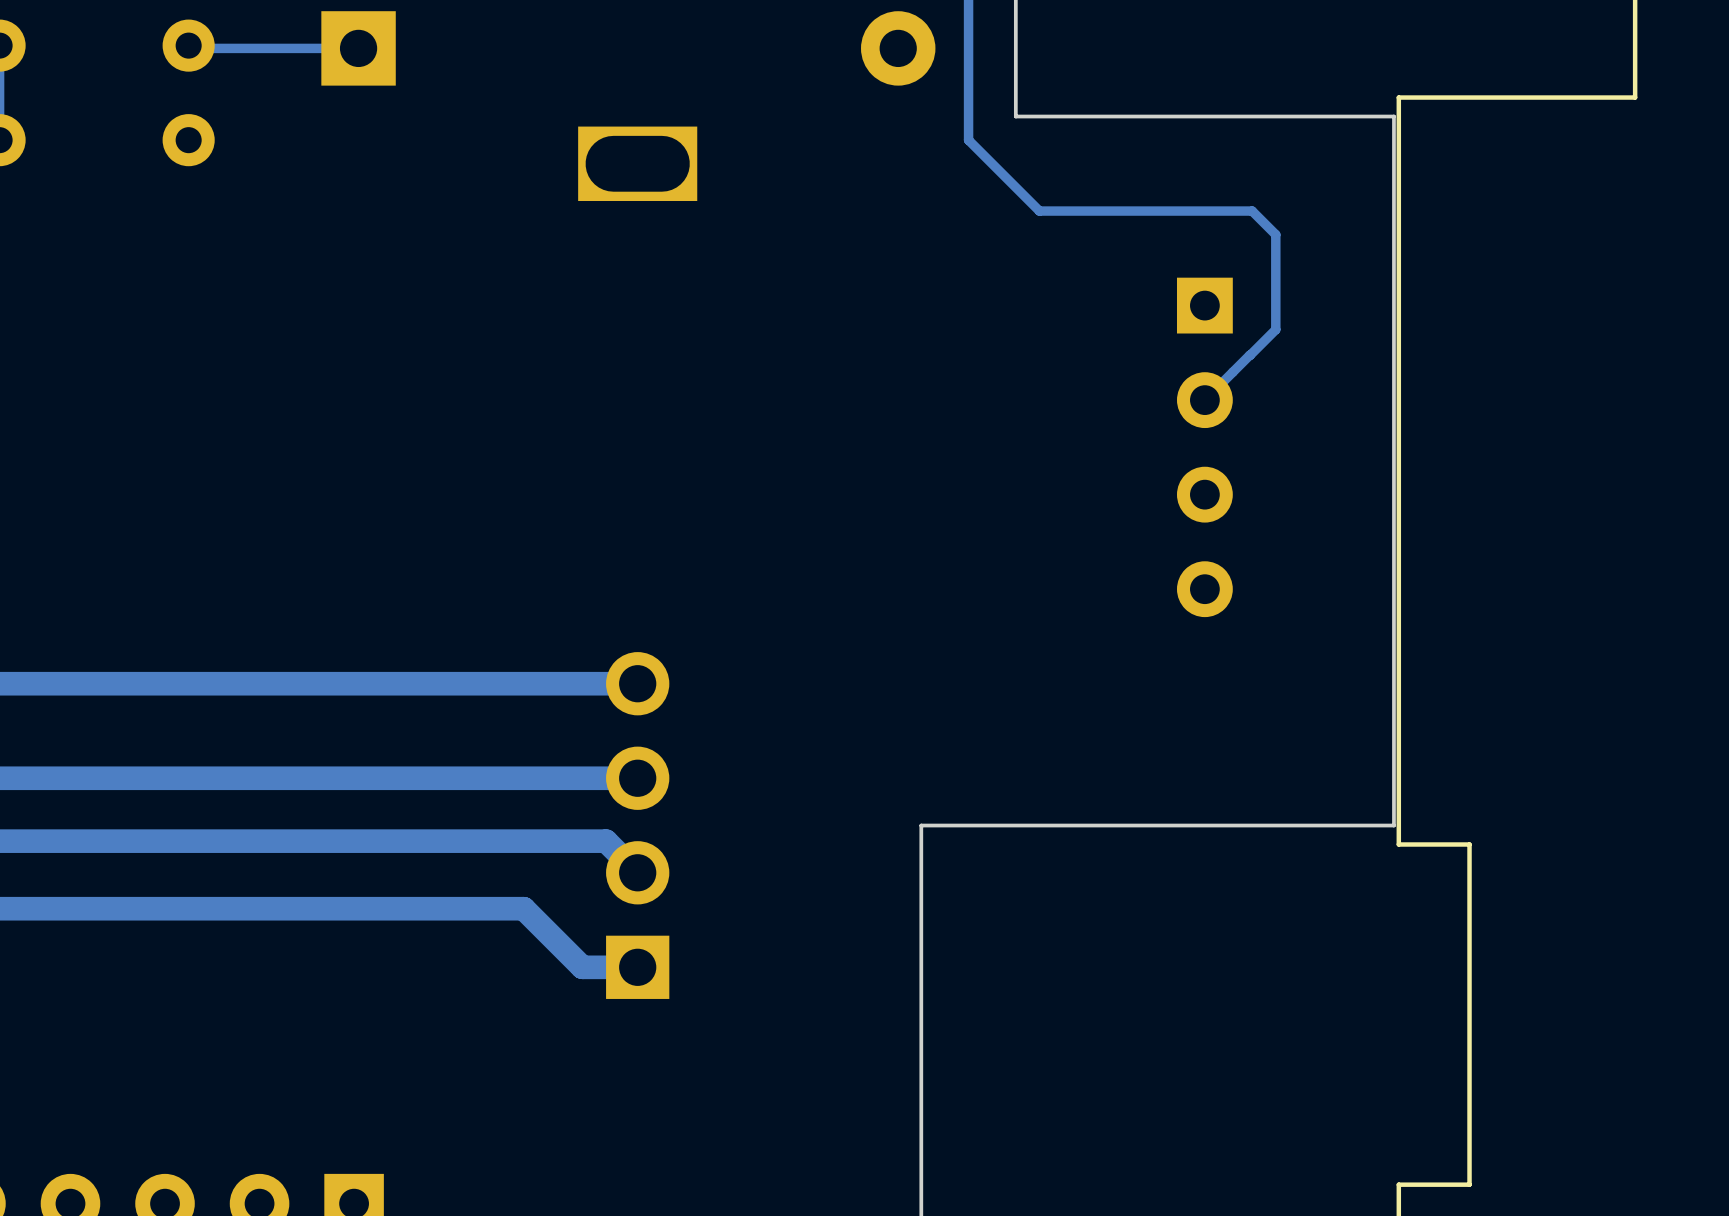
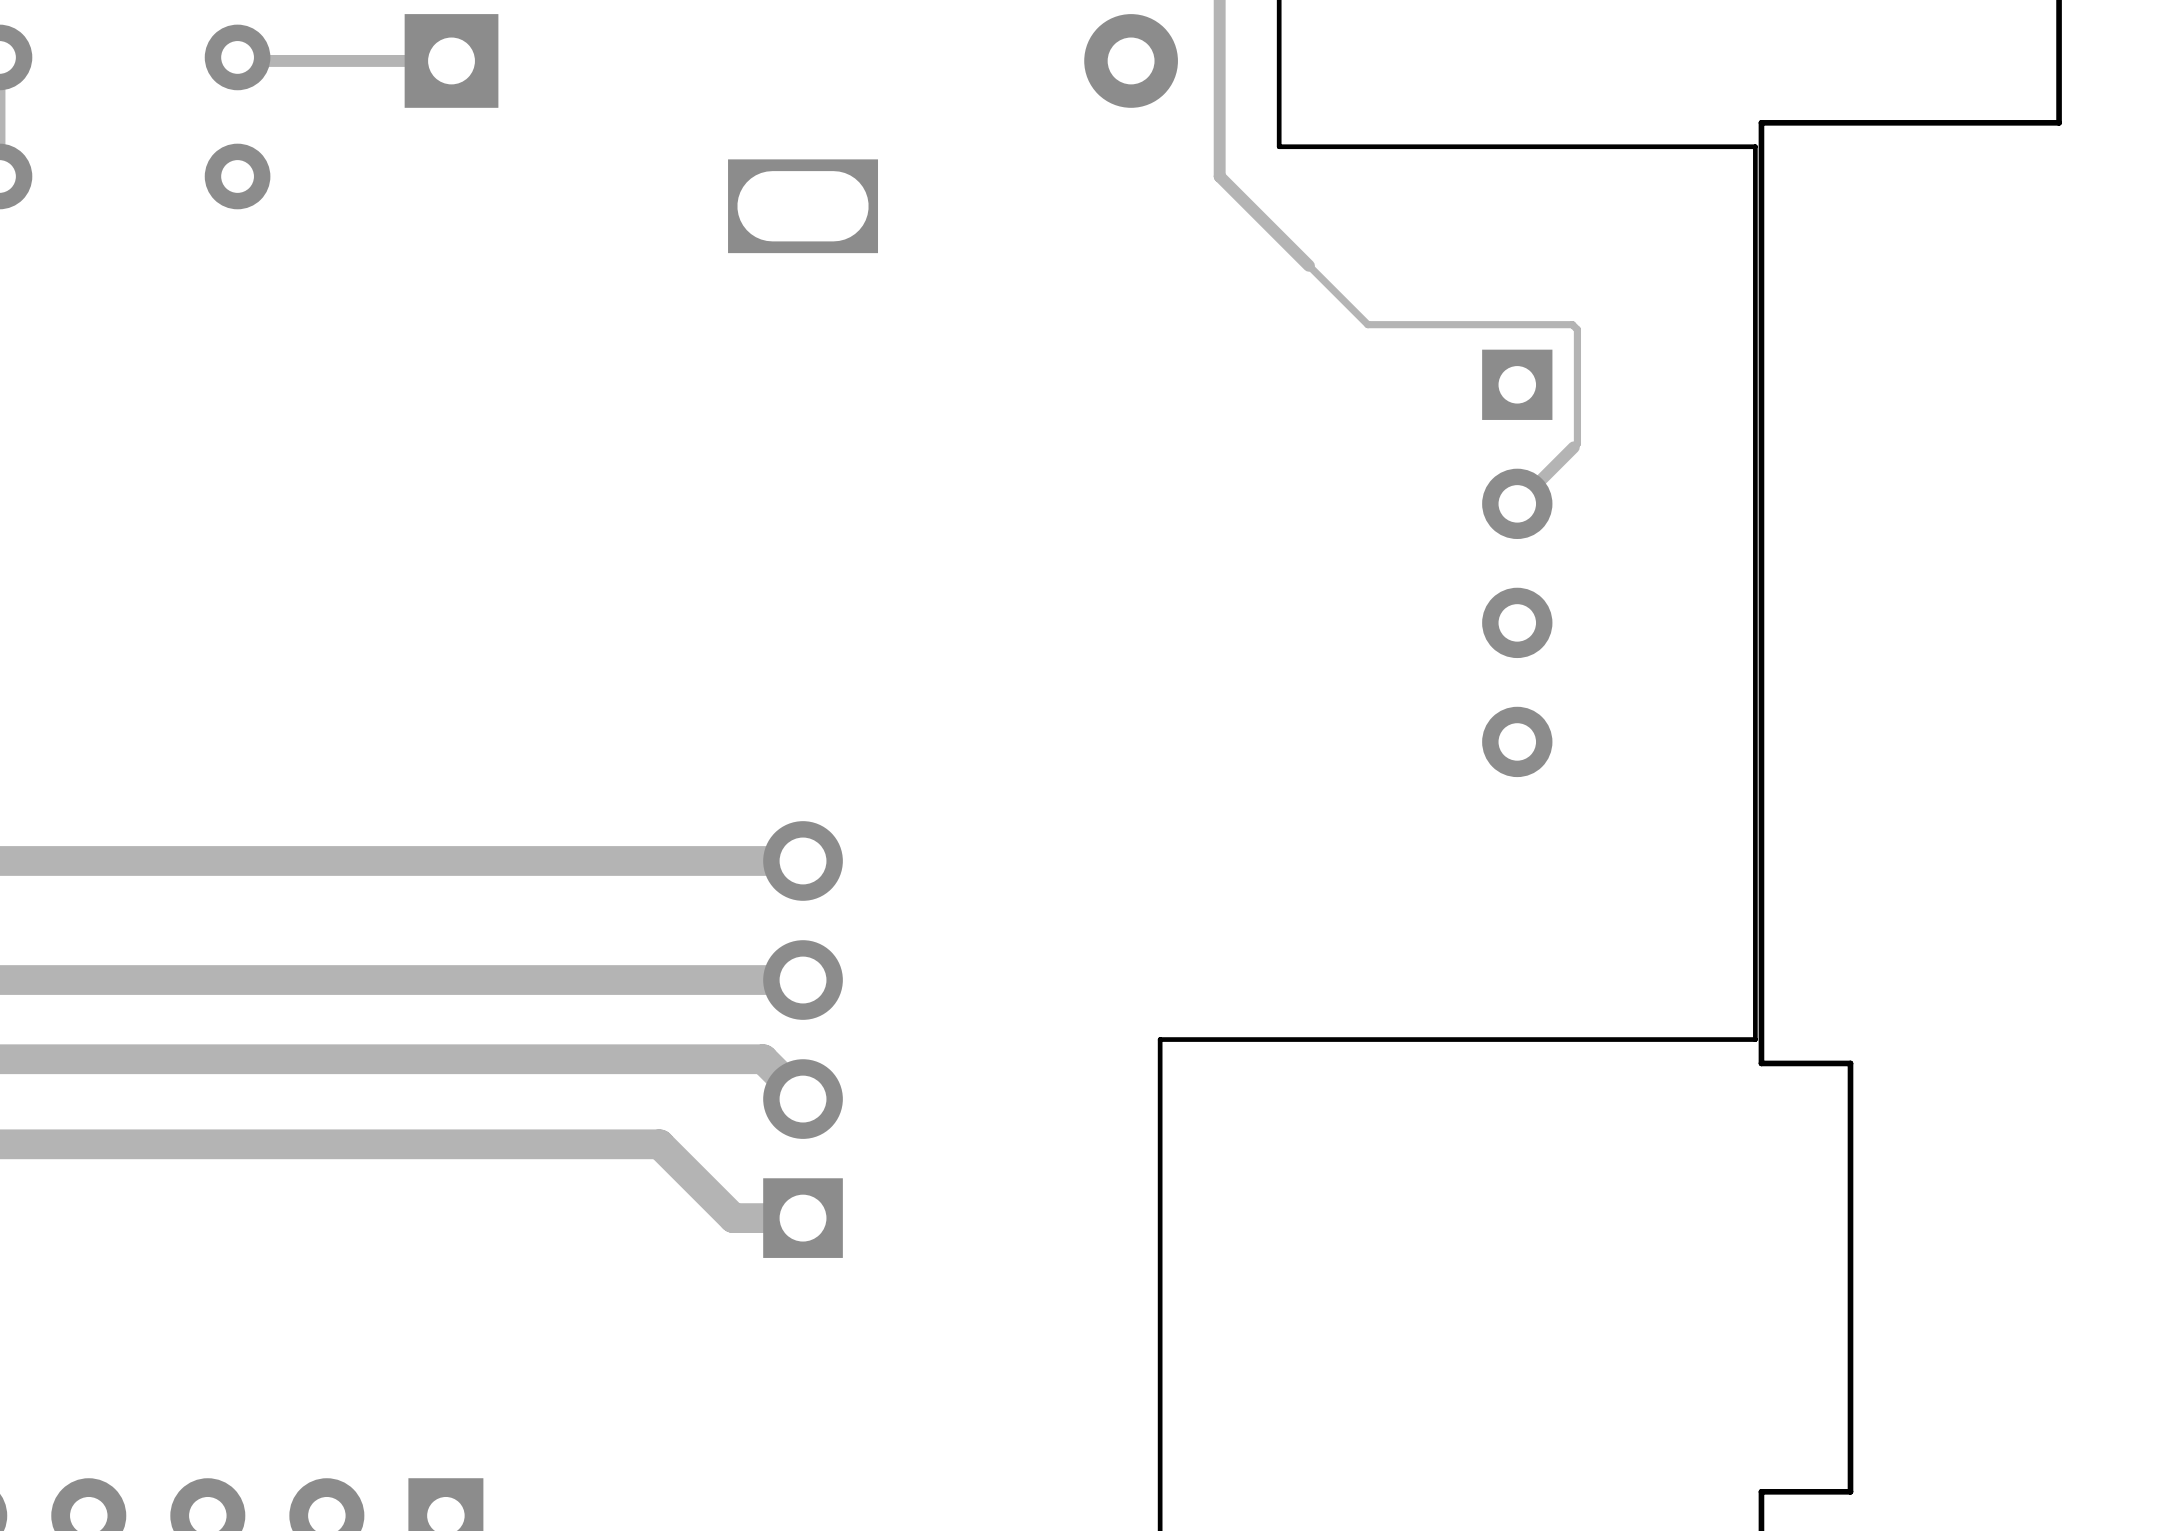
track: (1039, 211) (1252, 211) (1275, 234) (1275, 329) (1250, 355) -> (1308, 265) (1367, 324) (1572, 324) (1577, 329) (1577, 443) (1573, 447)

